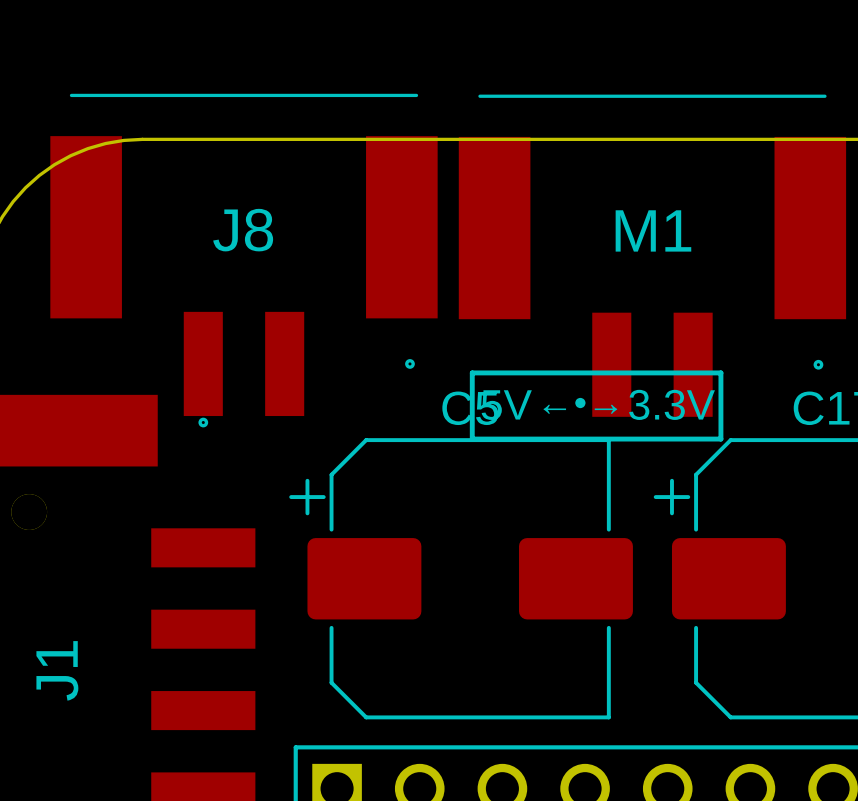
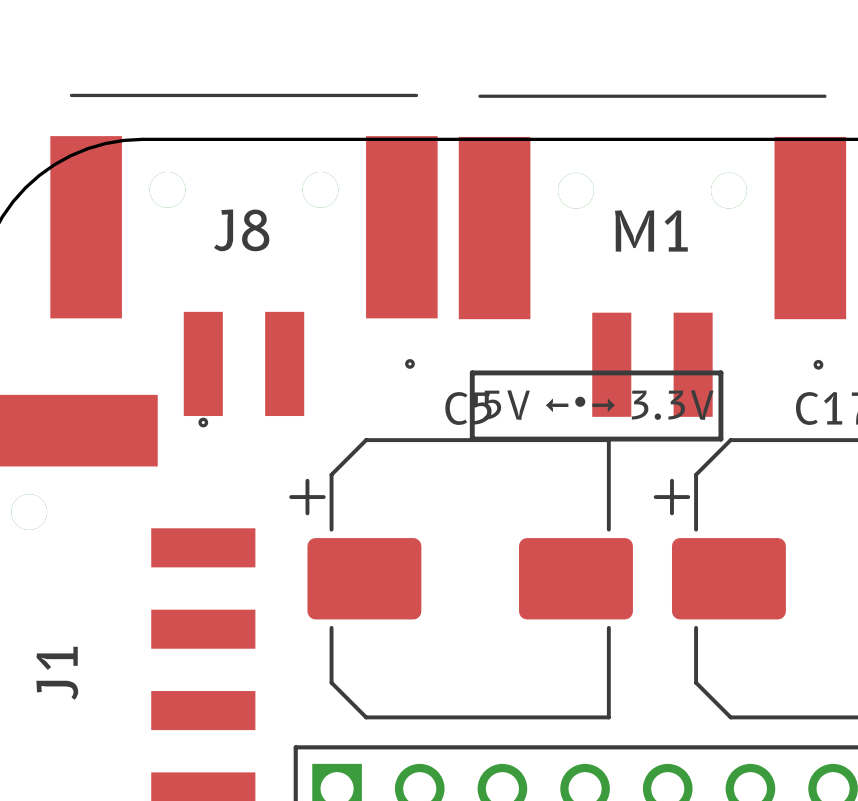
J8 footprint: [50, 93, 438, 417] -> [50, 93, 438, 417]
M1 footprint: [458, 94, 847, 417] -> [458, 94, 847, 417]

